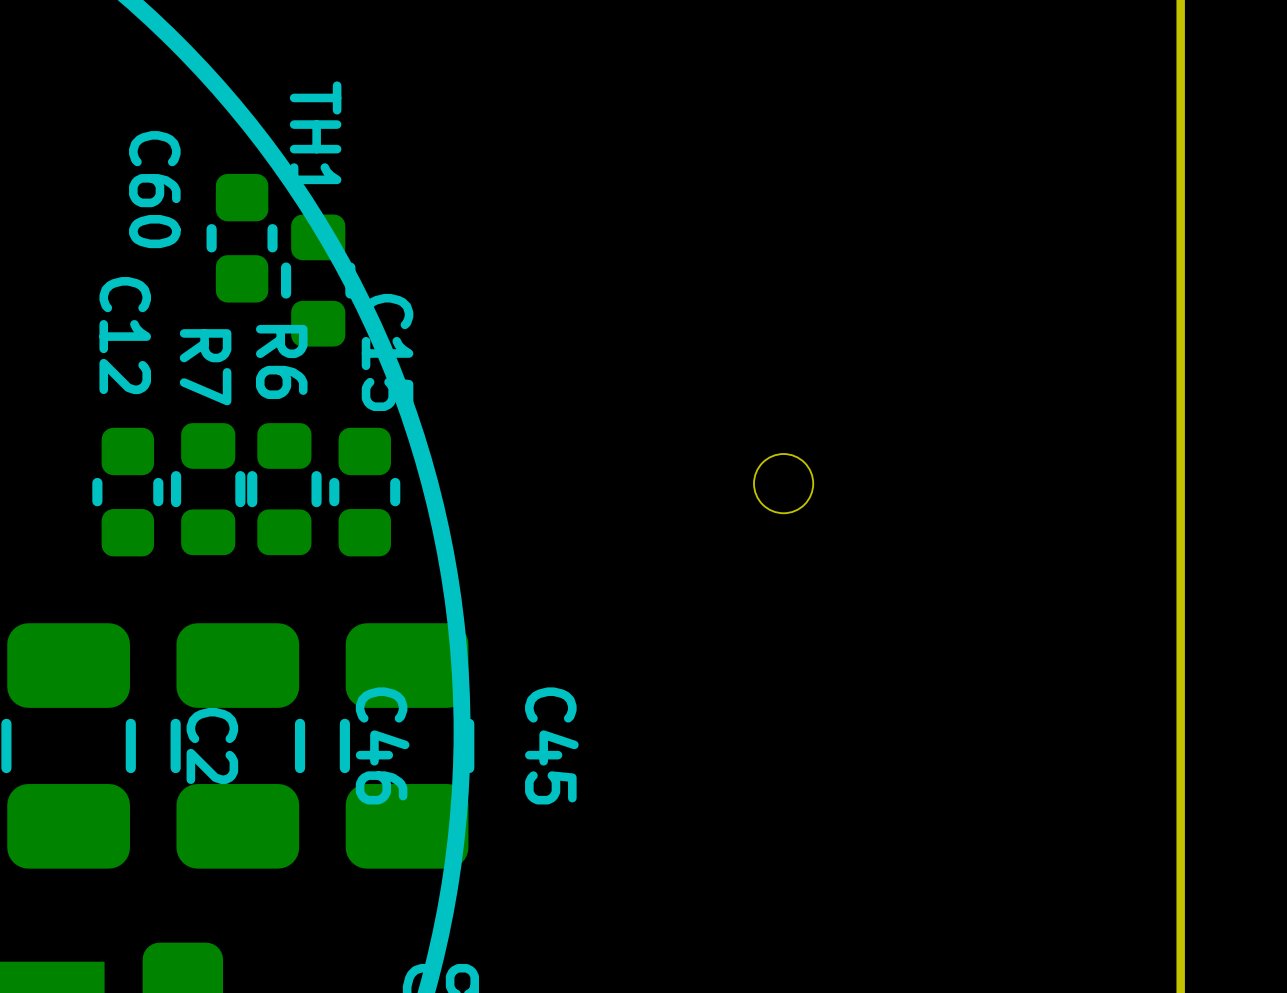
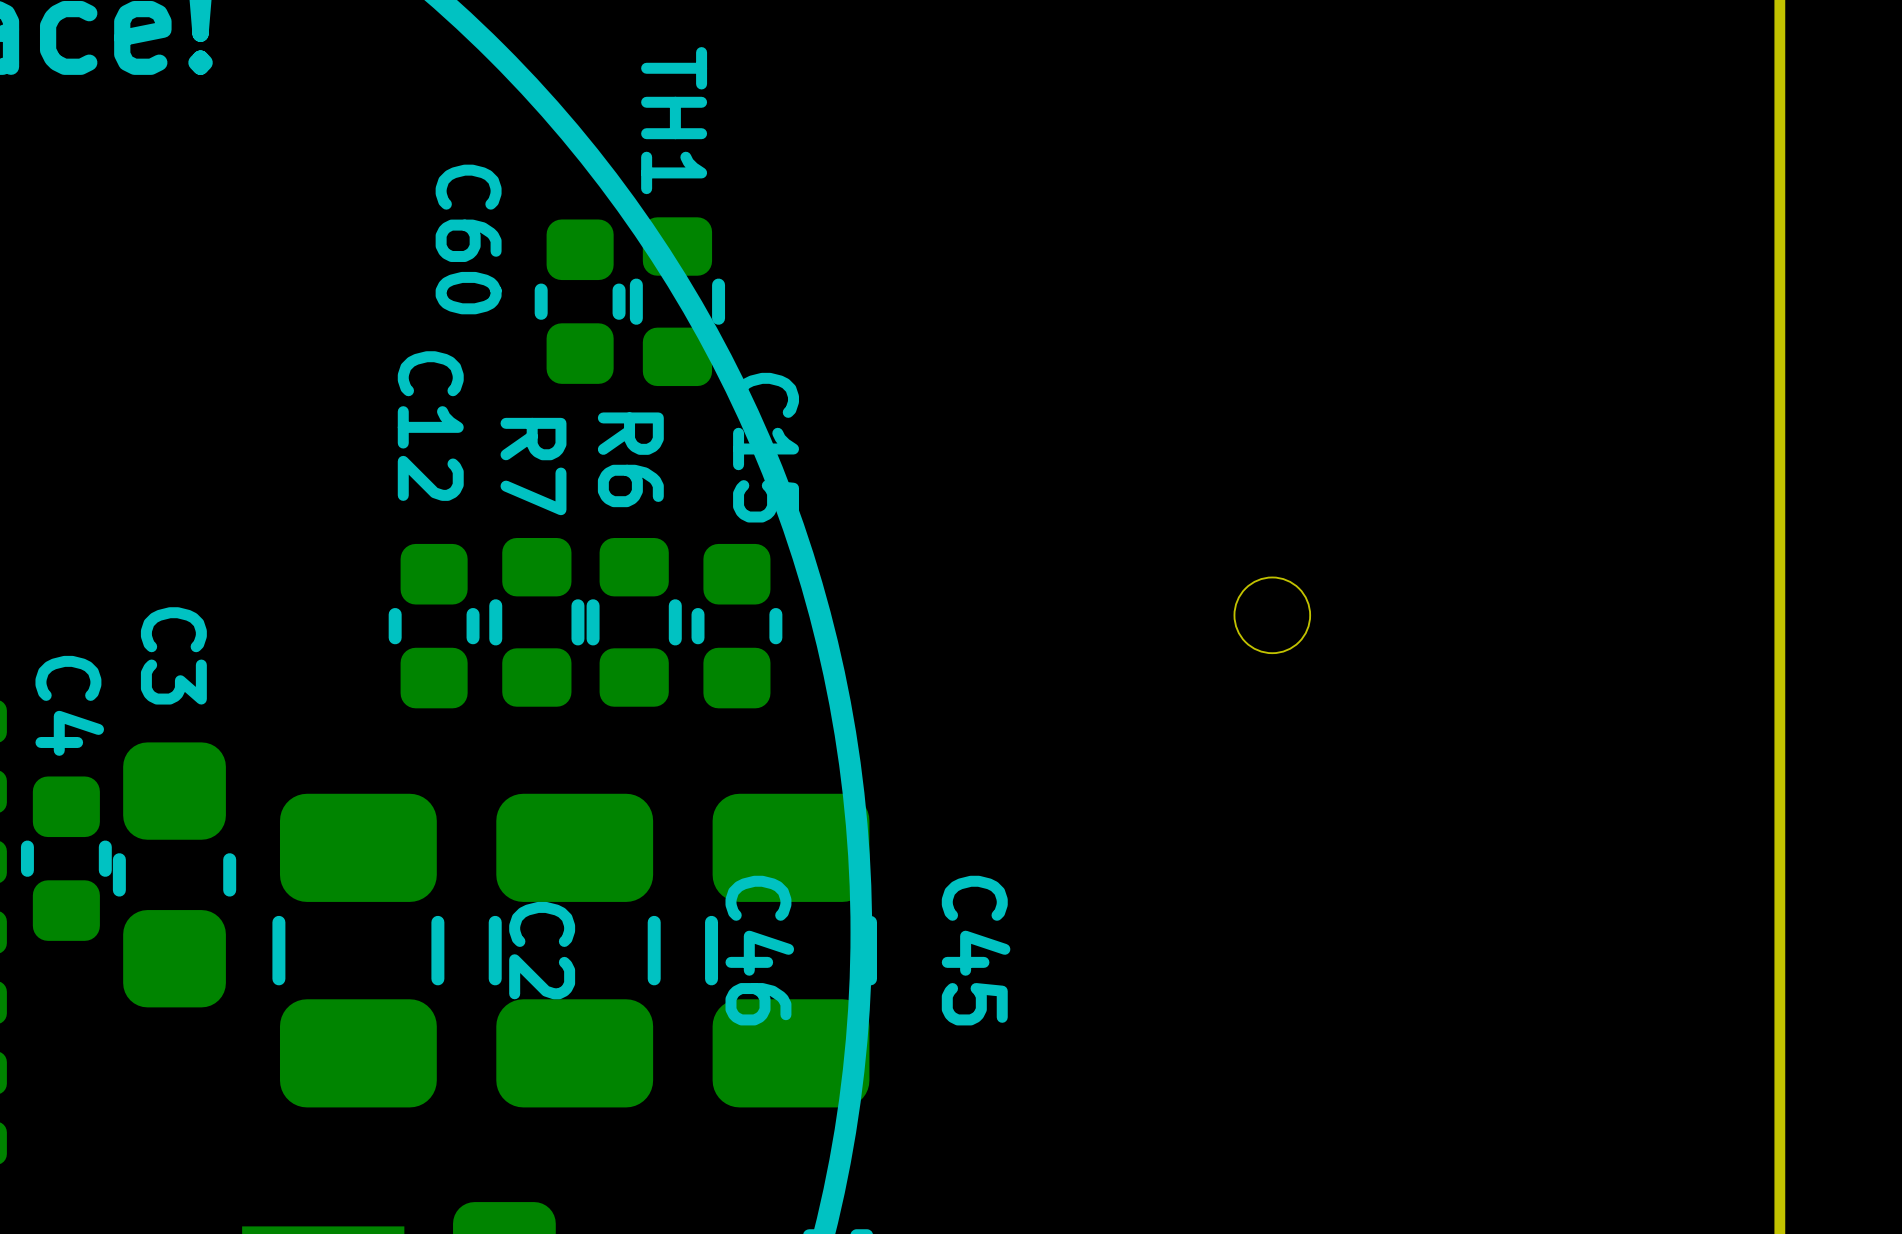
TH1 position: (318, 280) -> (677, 301)

